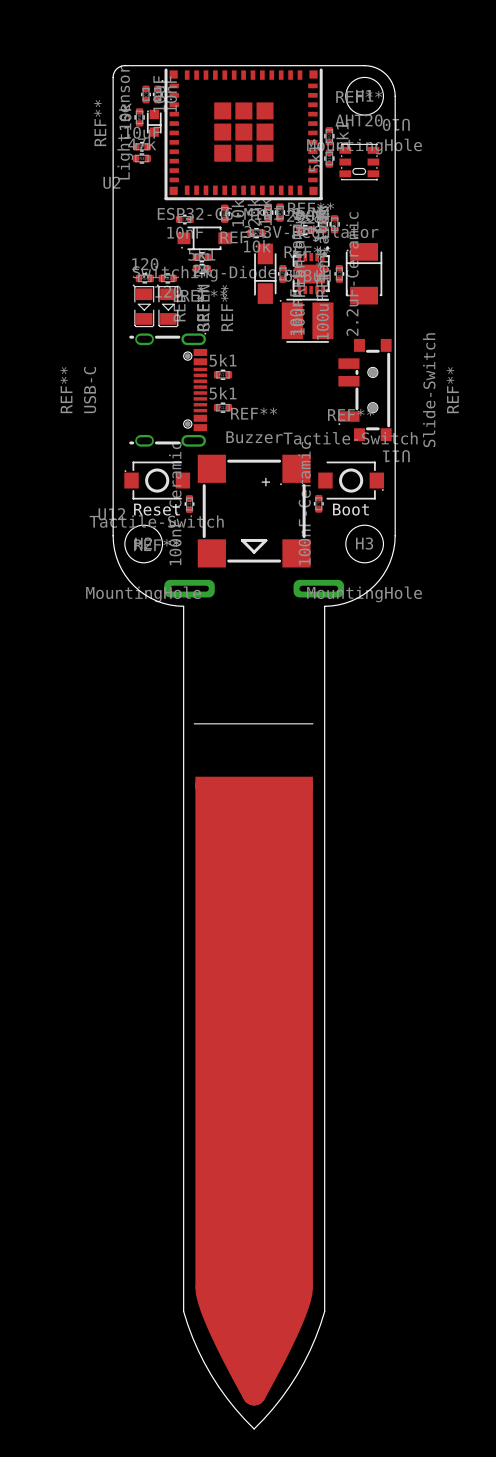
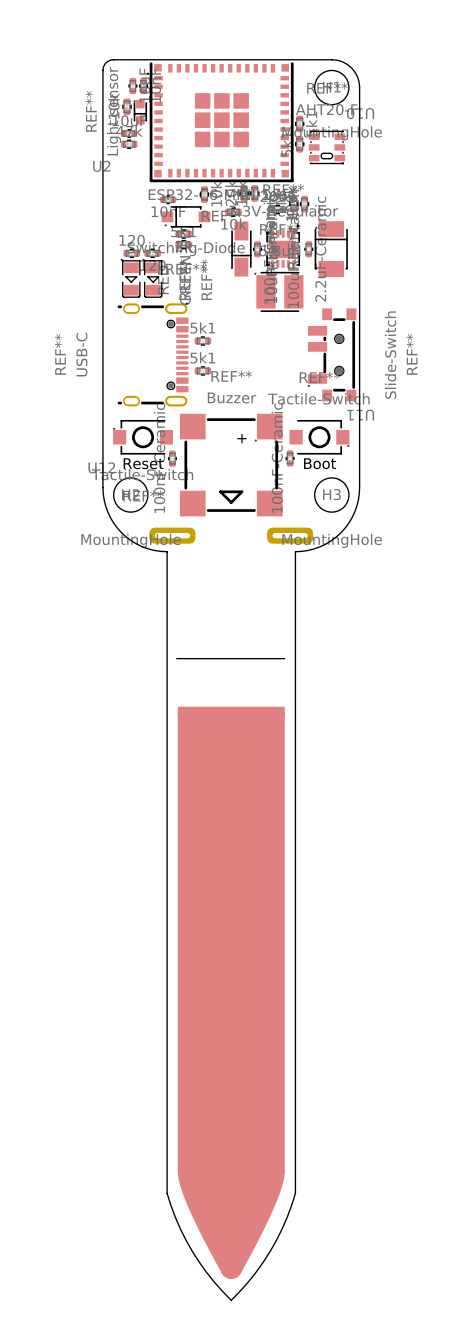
part value: AHT20 (358, 120) -> AHT20-F (326, 109)

